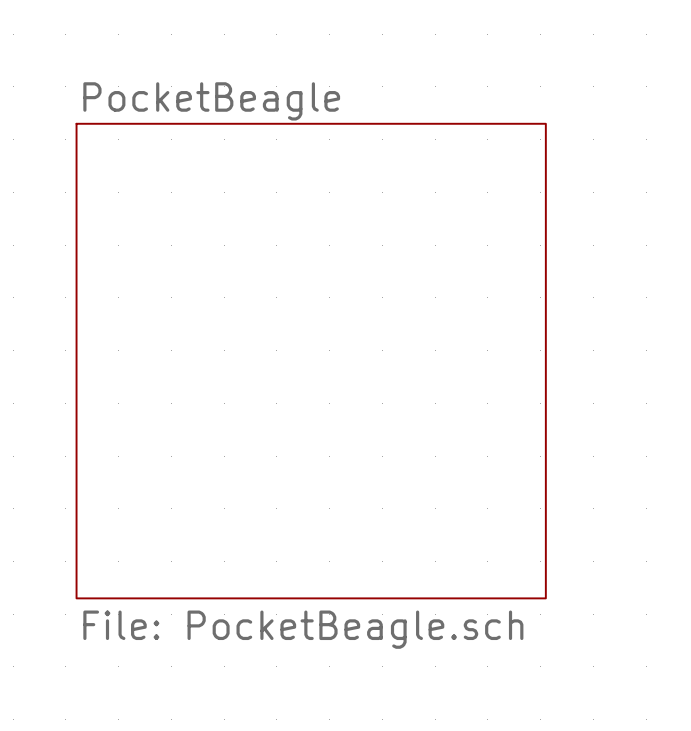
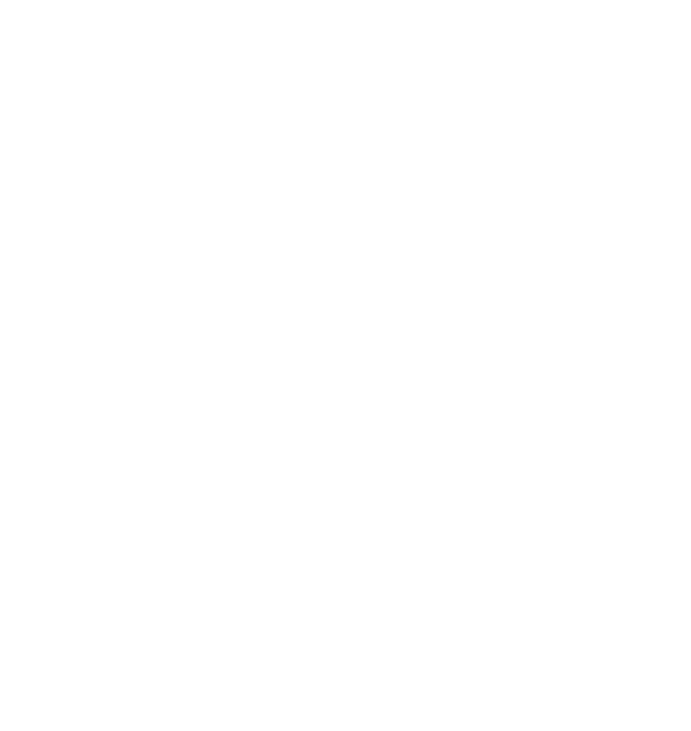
sheet PocketBeagle: File: PocketBeagle.sch (311, 361) -> none

